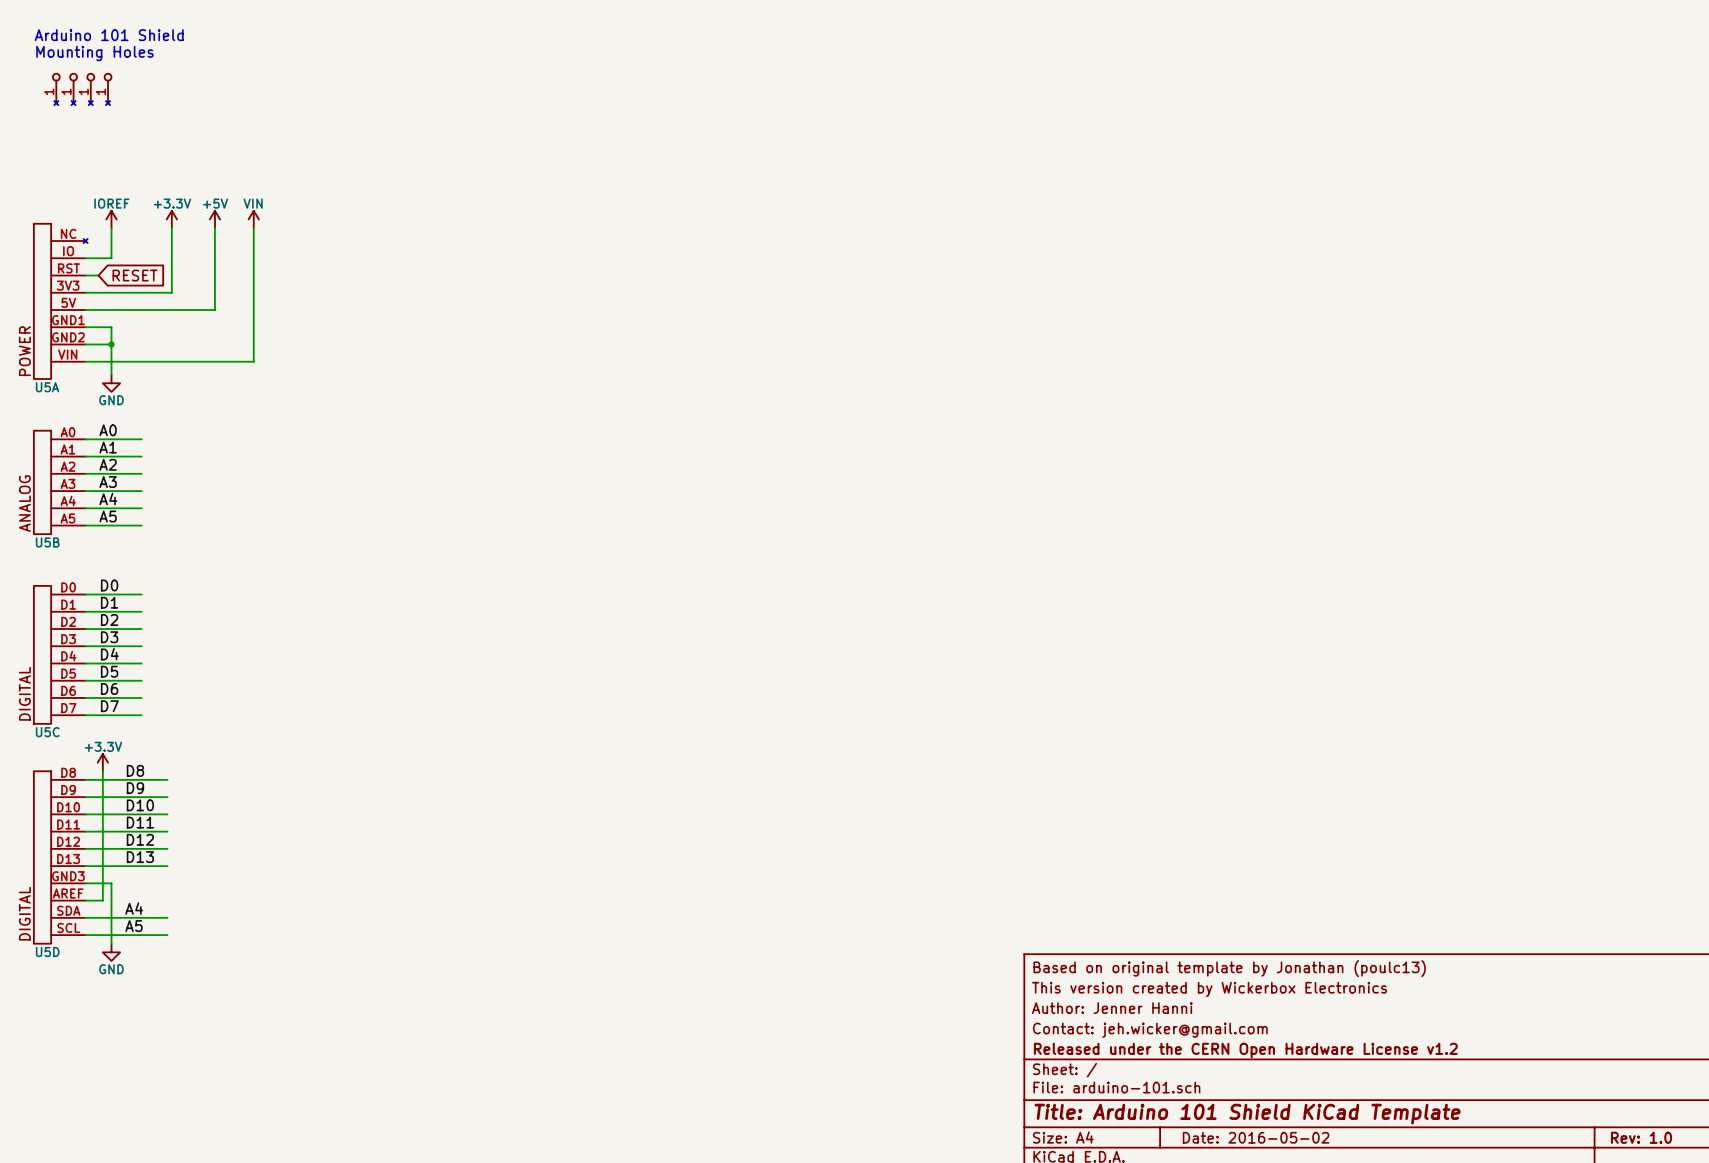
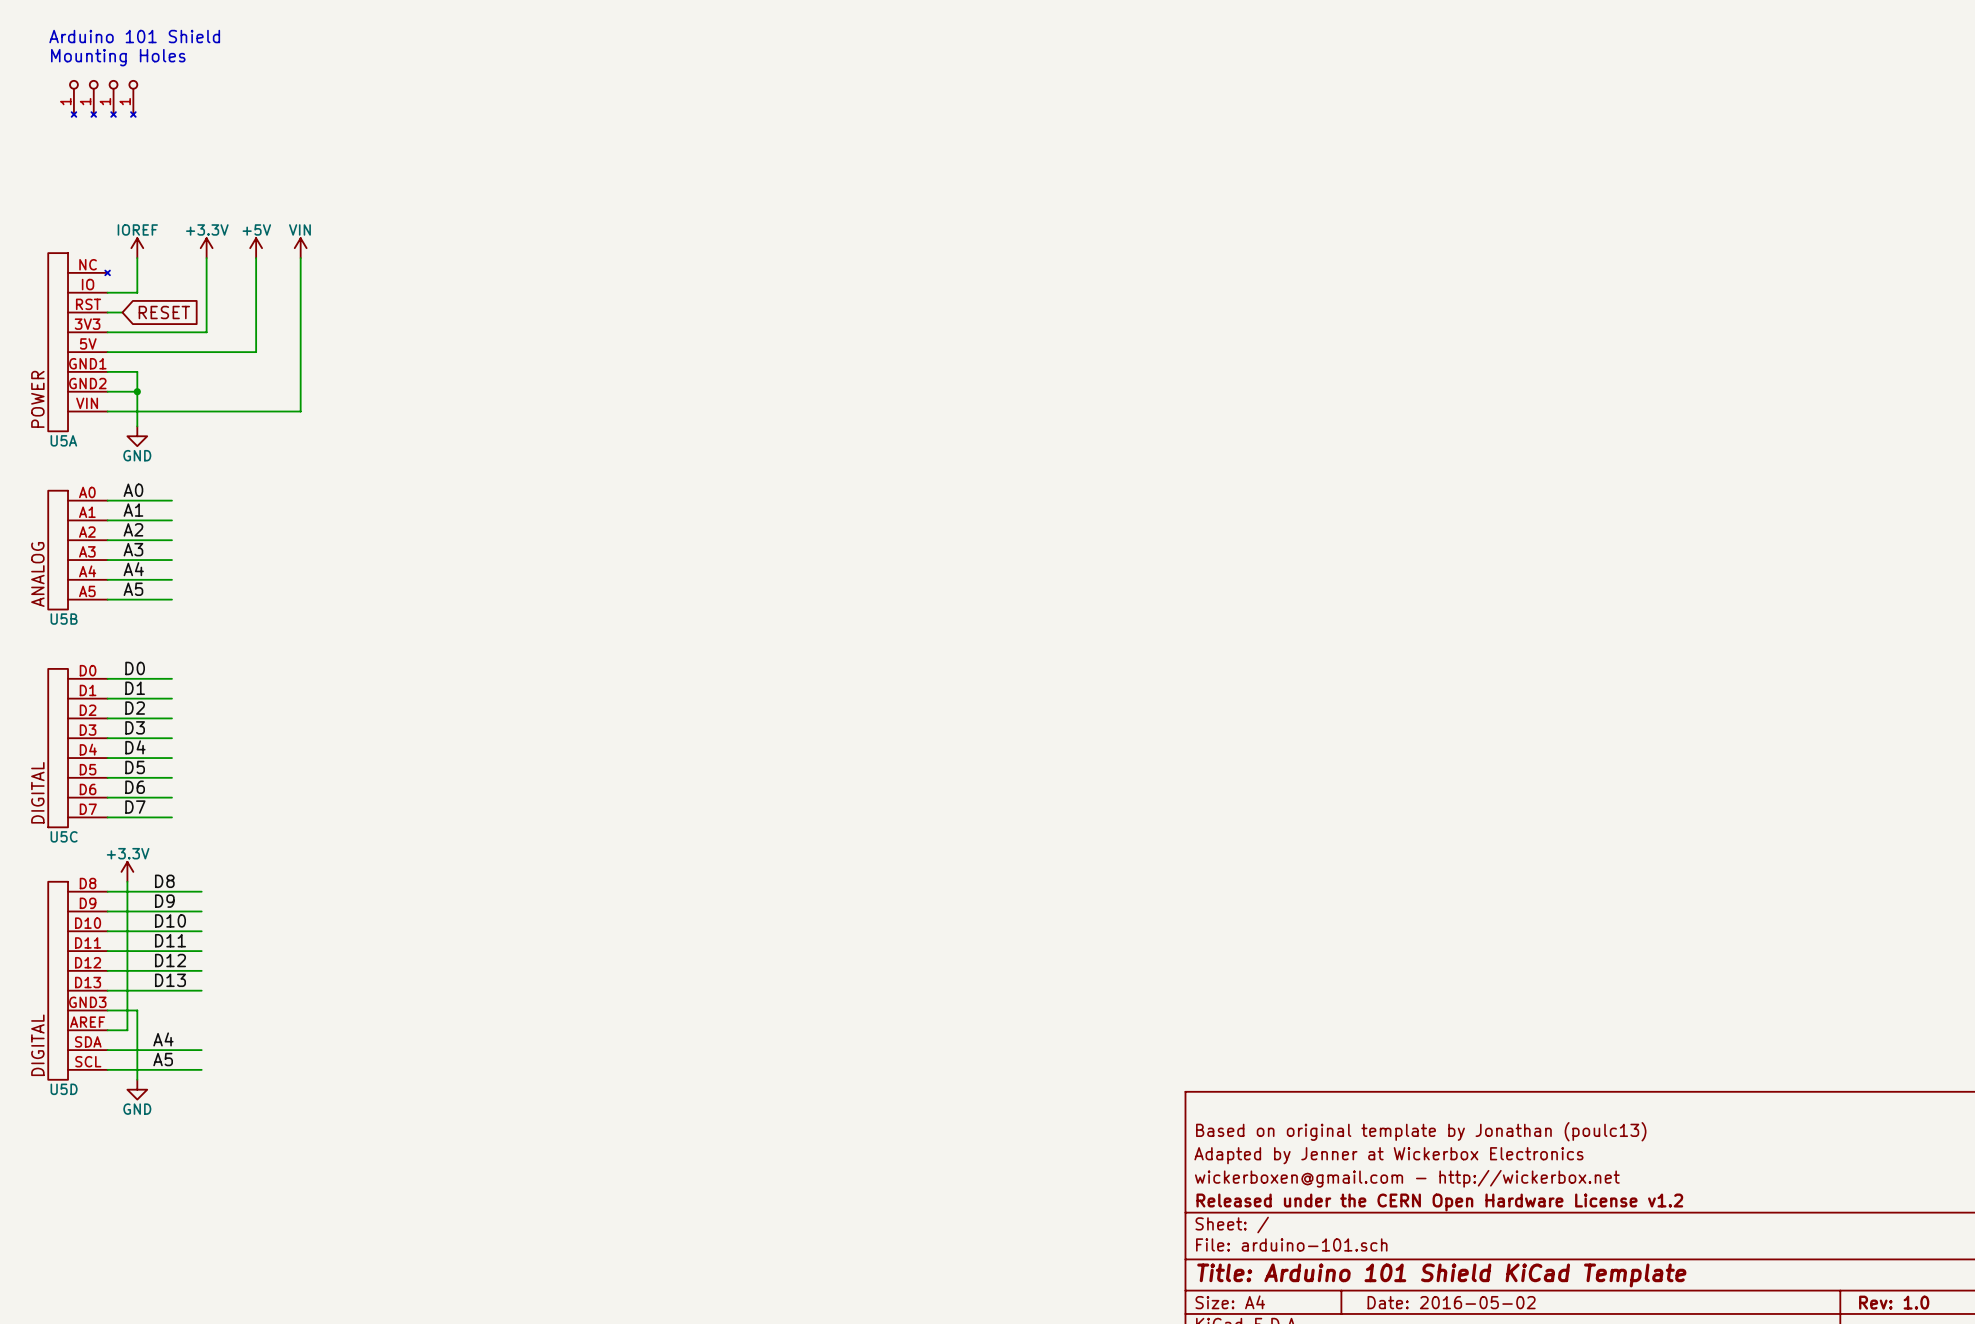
title block: Based on original template by Jonathan (poulc13) (1229, 968) -> none
title block: This version created by Wickerbox Electronics (1209, 989) -> Based on original template by Jonathan (poulc13) (1421, 1131)
title block: Author: Jenner Hanni (1112, 1008) -> Adapted by Jenner at Wickerbox Electronics (1388, 1155)
title block: Contact: jeh.wicker@gmail.com (1150, 1030) -> wickerboxen@gmail.com - http://wickerbox.net (1407, 1178)

